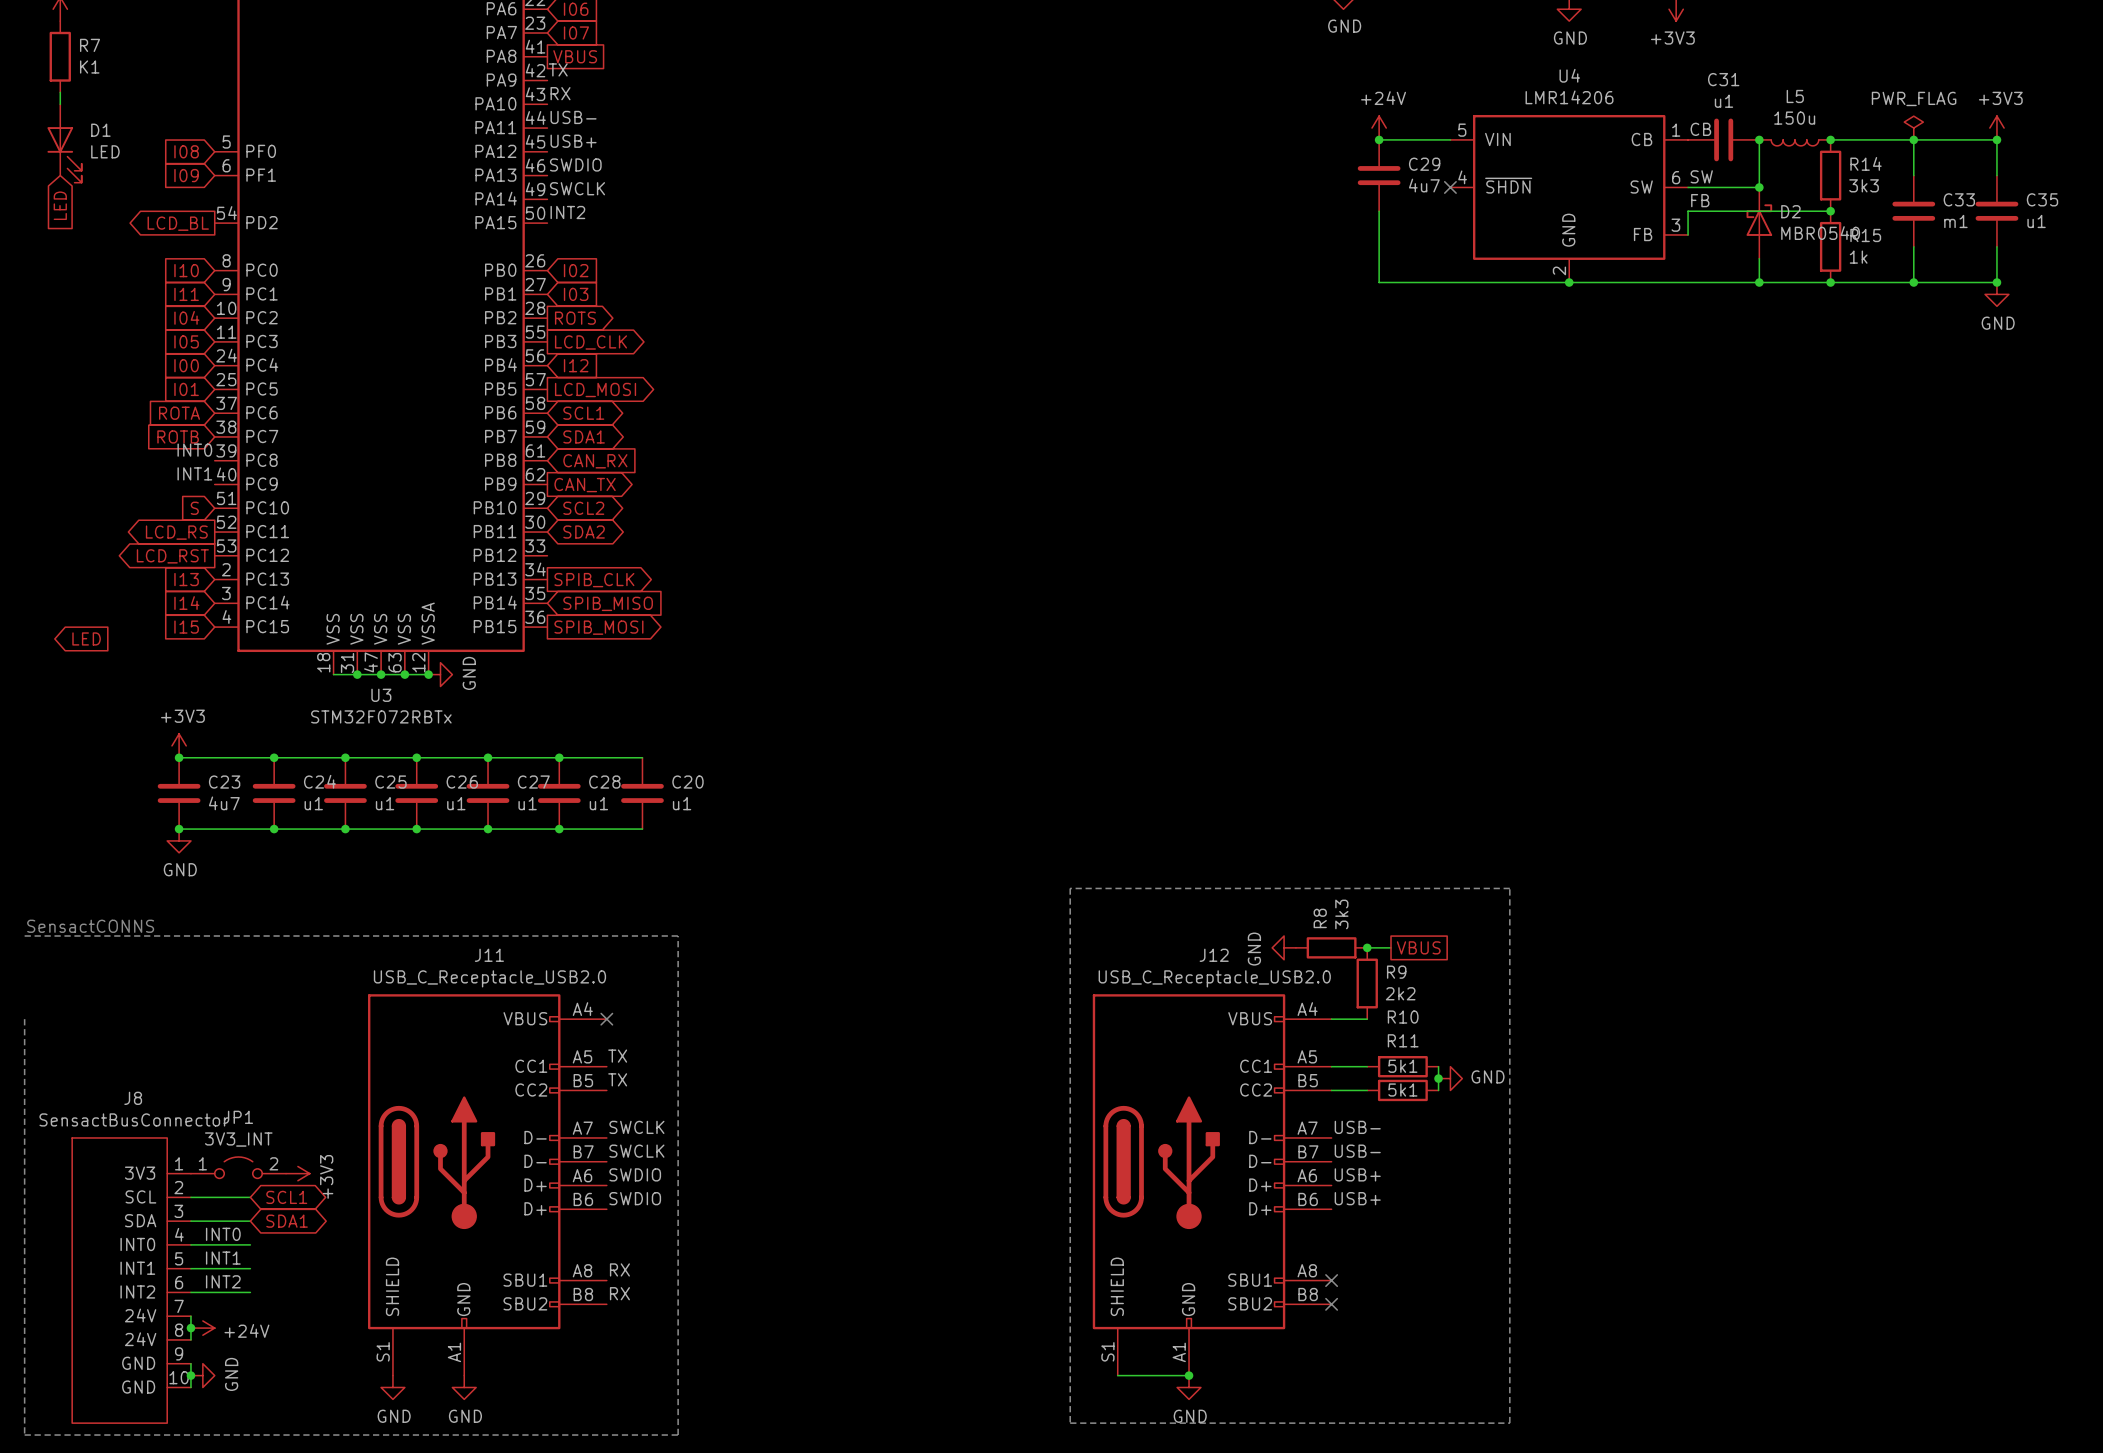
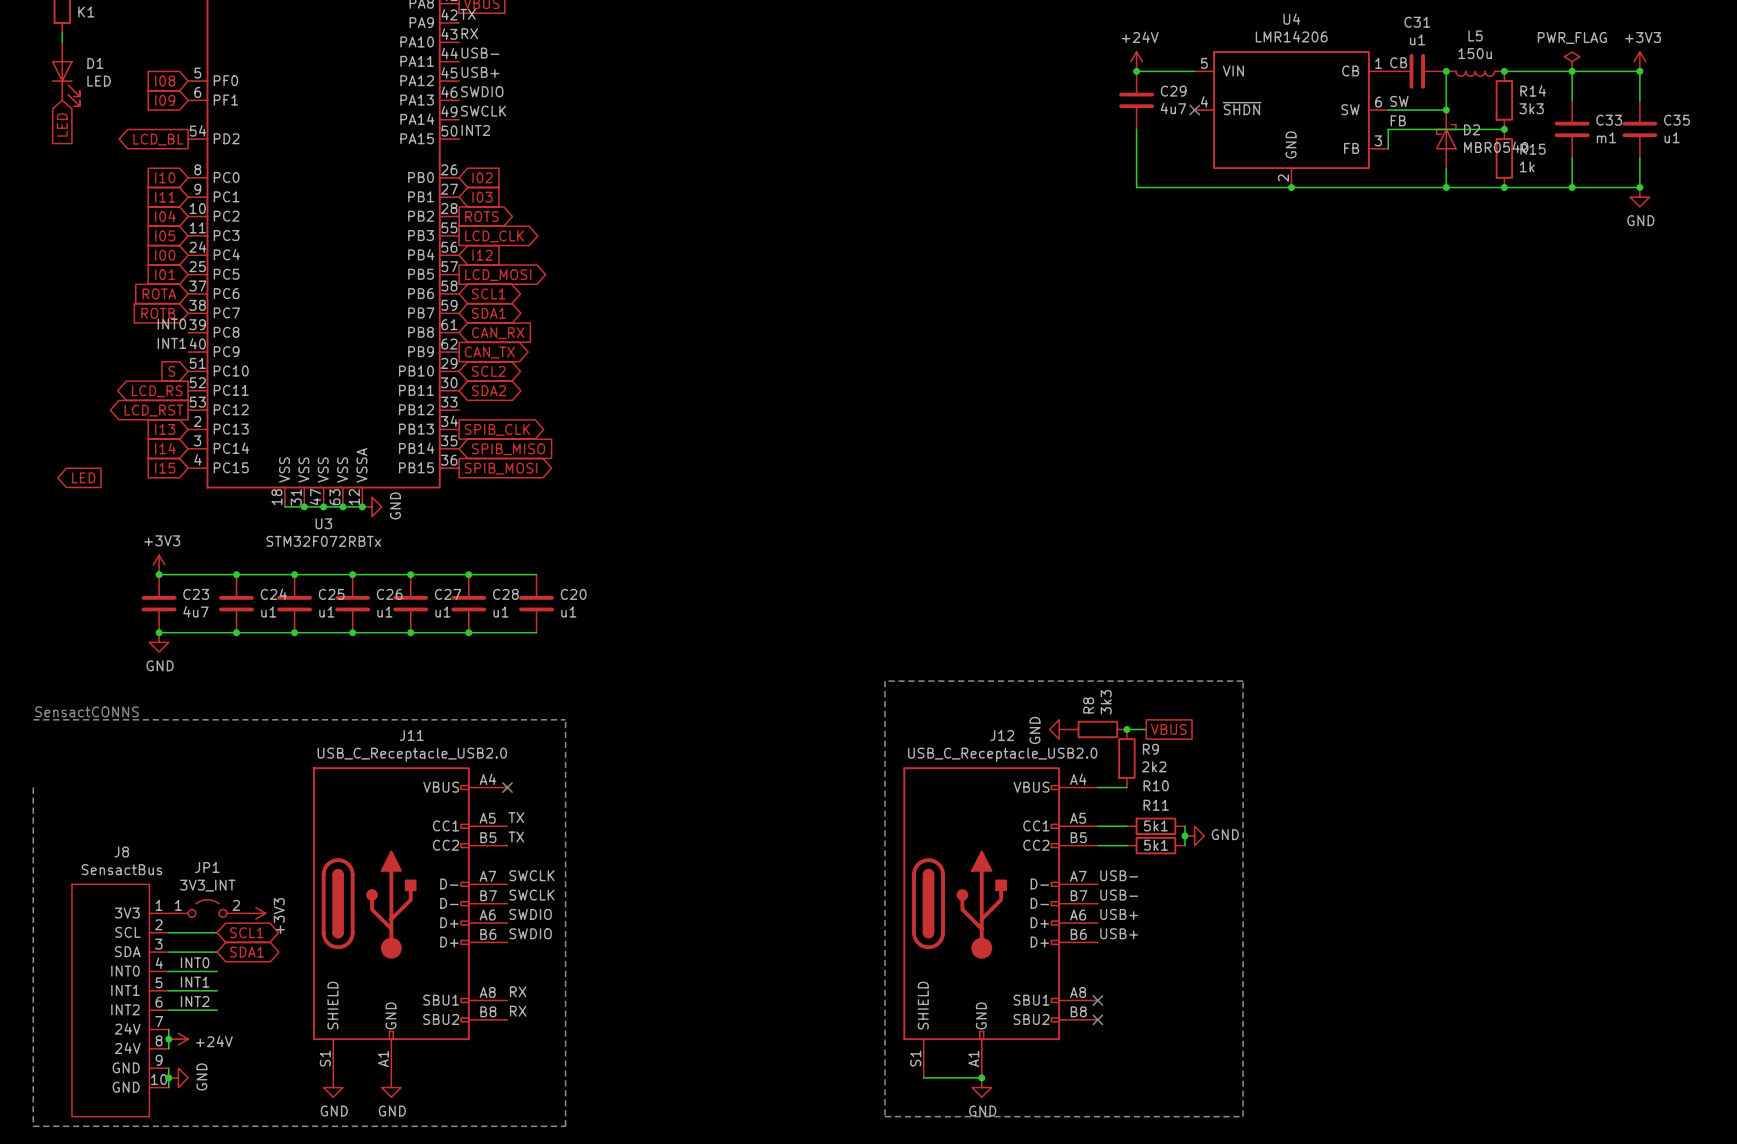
J8 value: SensactBusConnector (134, 1119) -> SensactBus (121, 869)

